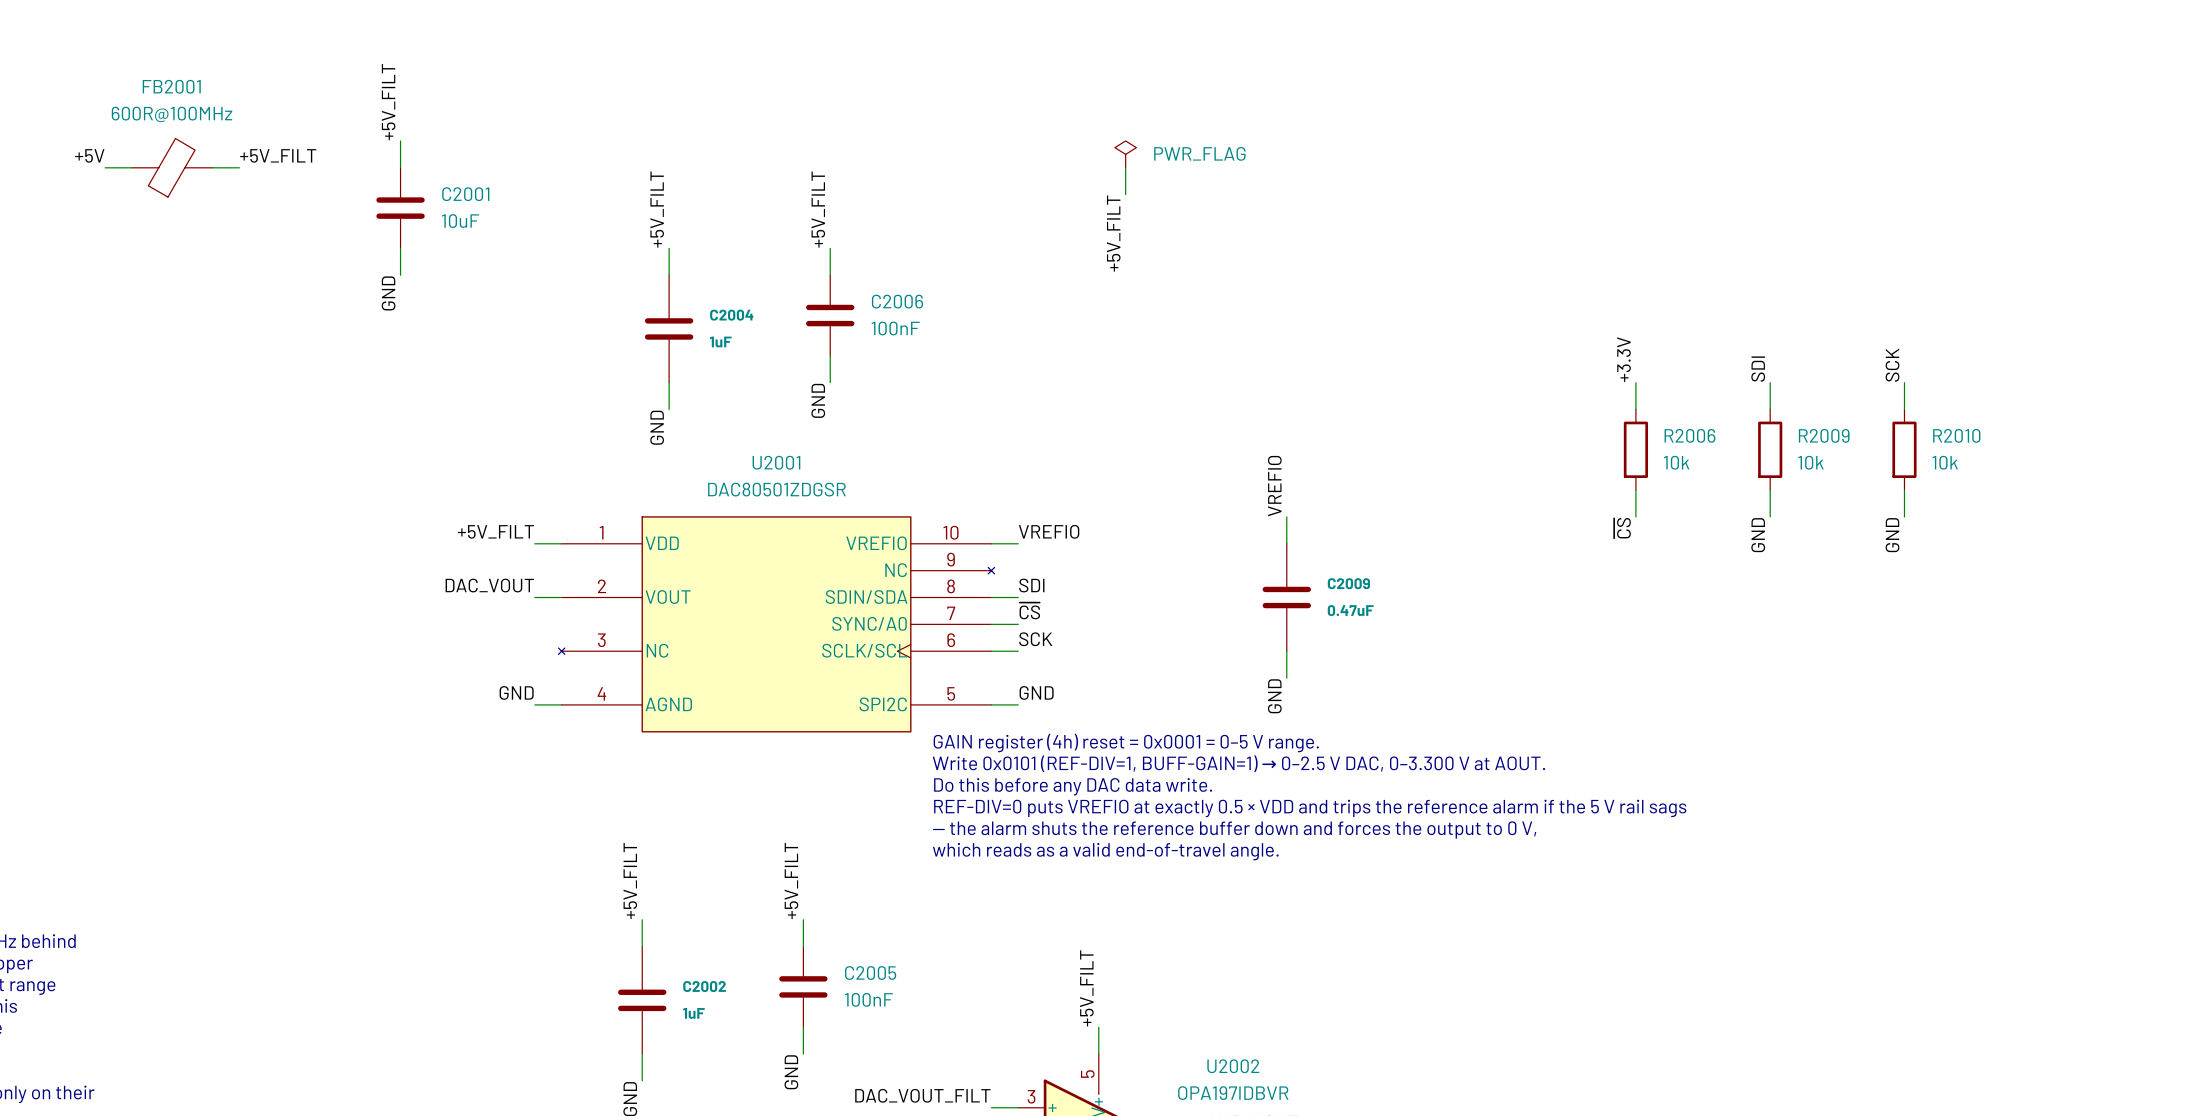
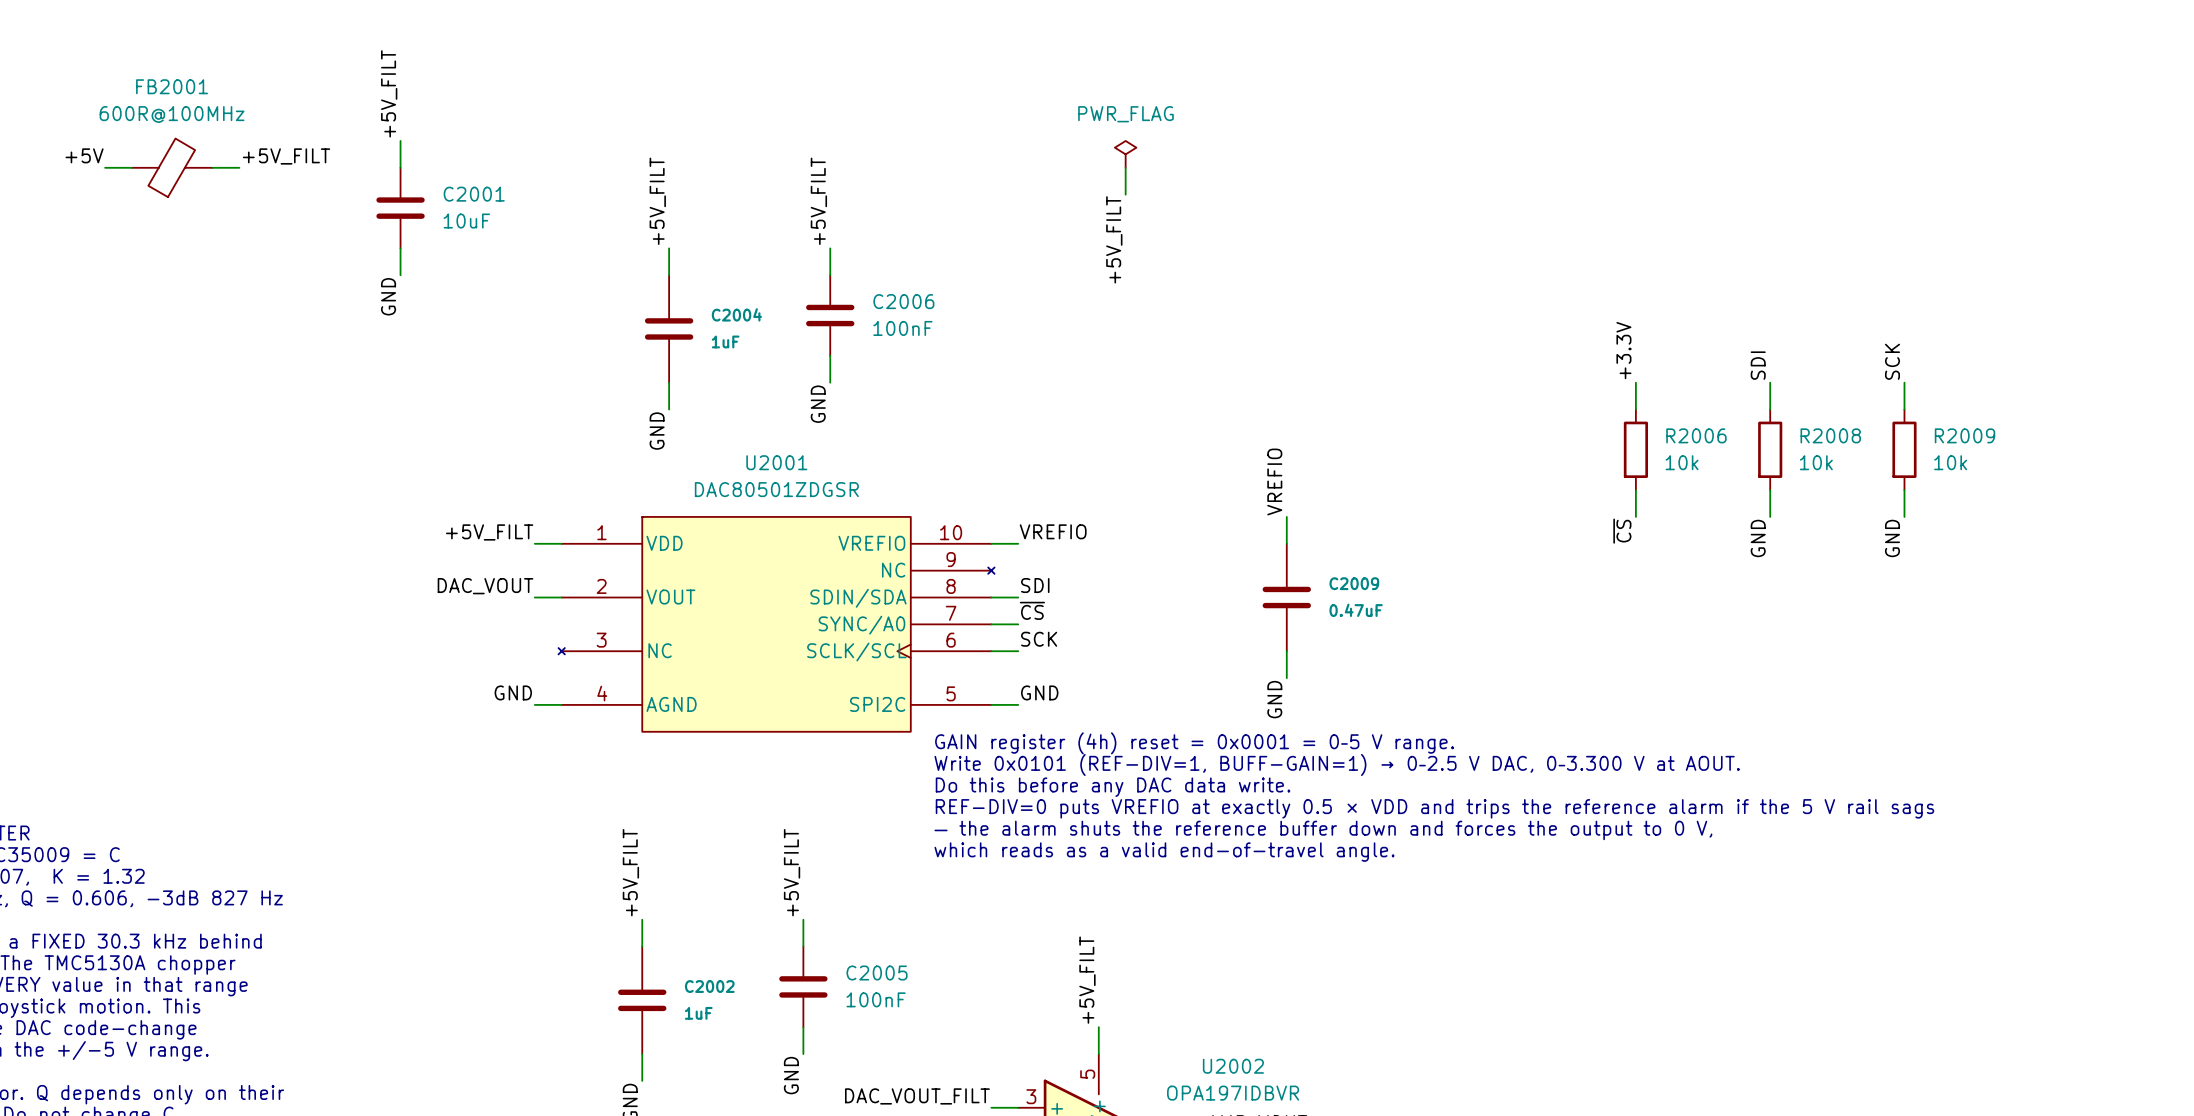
power symbol text position: PWR_FLAG (1199, 153) -> PWR_FLAG (1125, 114)
R2009 name: R2009 (1824, 435) -> R2008 (1830, 435)
R2010 name: R2010 (1956, 435) -> R2009 (1965, 435)

